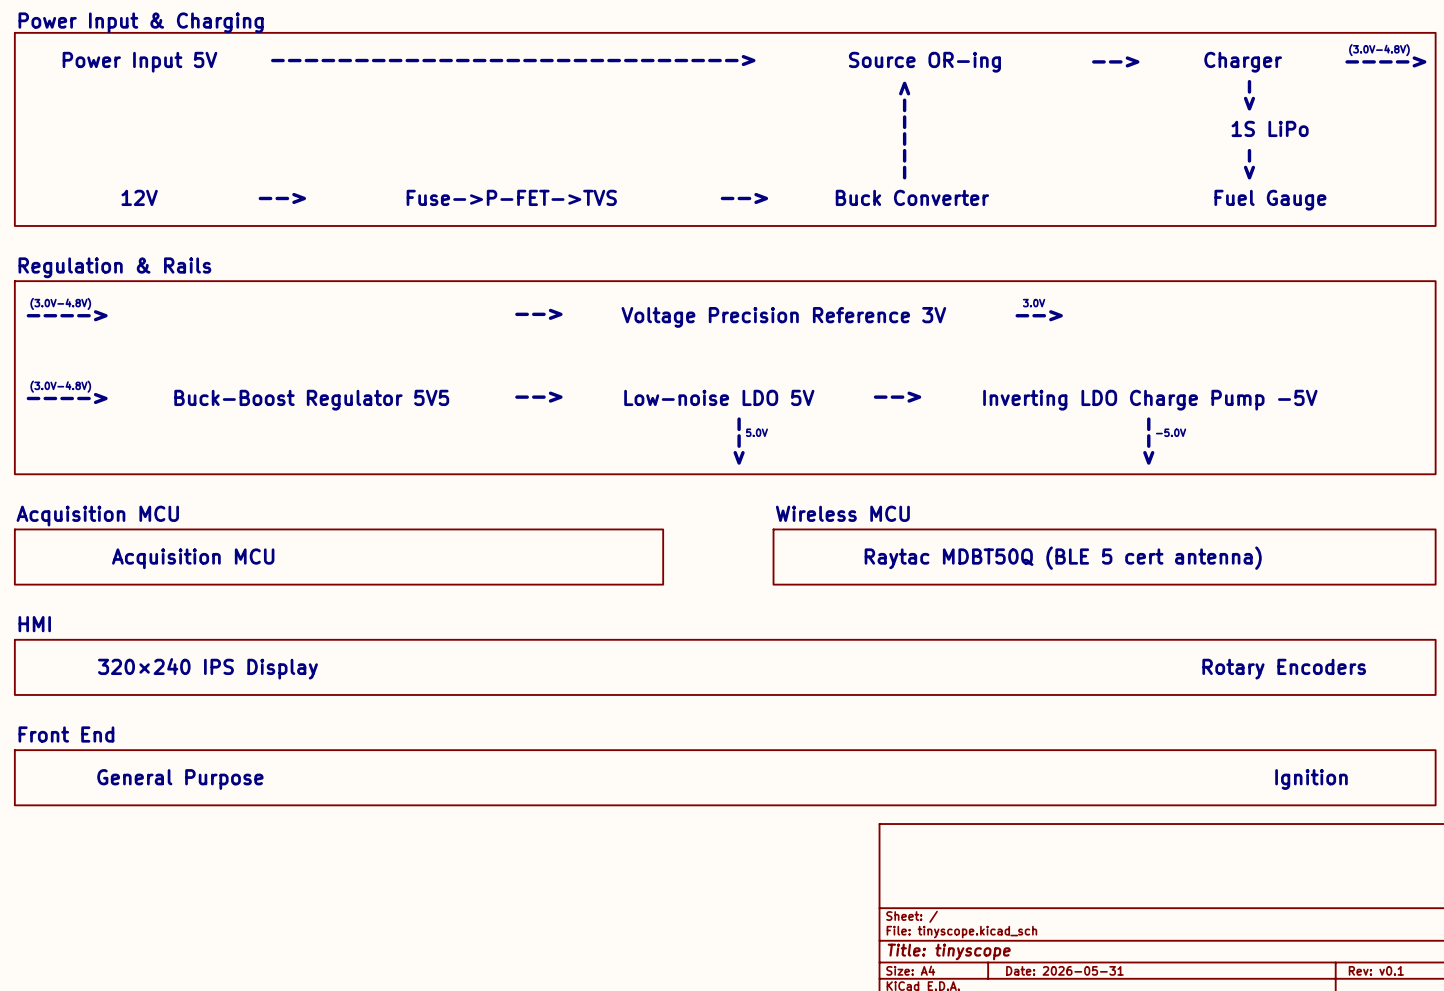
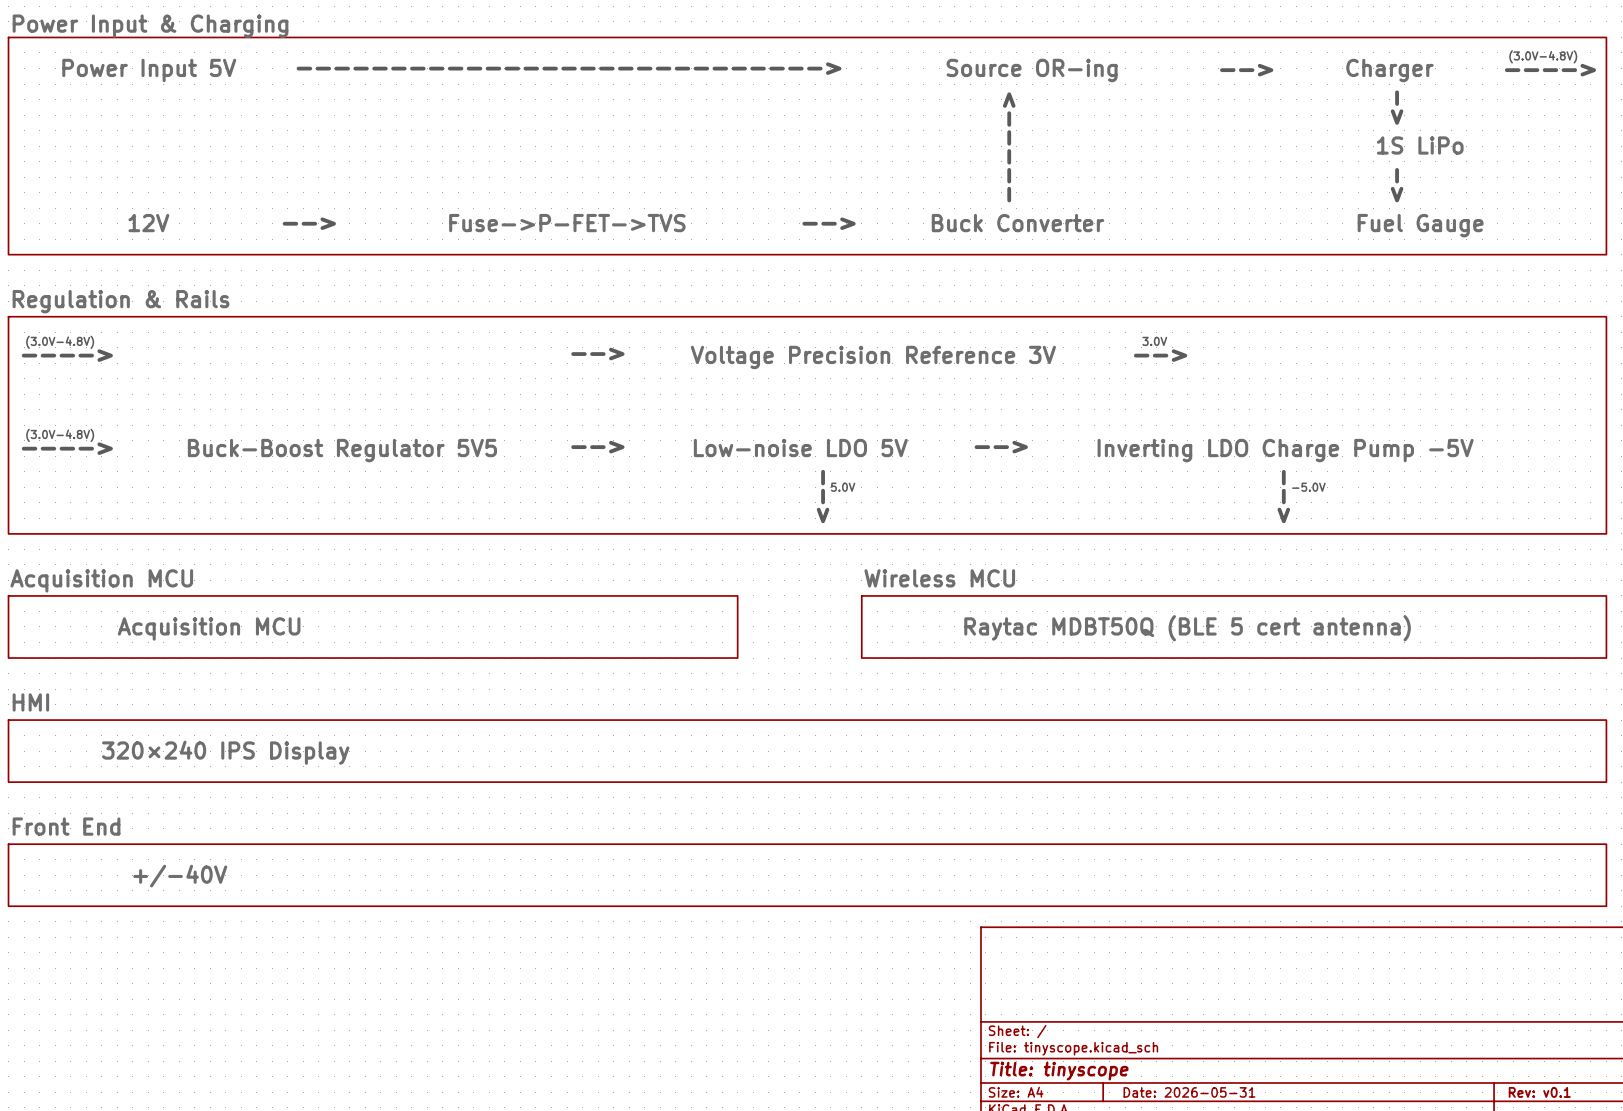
sheet HMI text: Rotary Encoders (1284, 669) -> none
sheet Front End text: General Purpose (180, 779) -> +/-40V (180, 876)
sheet Front End text: Ignition (1311, 779) -> none

